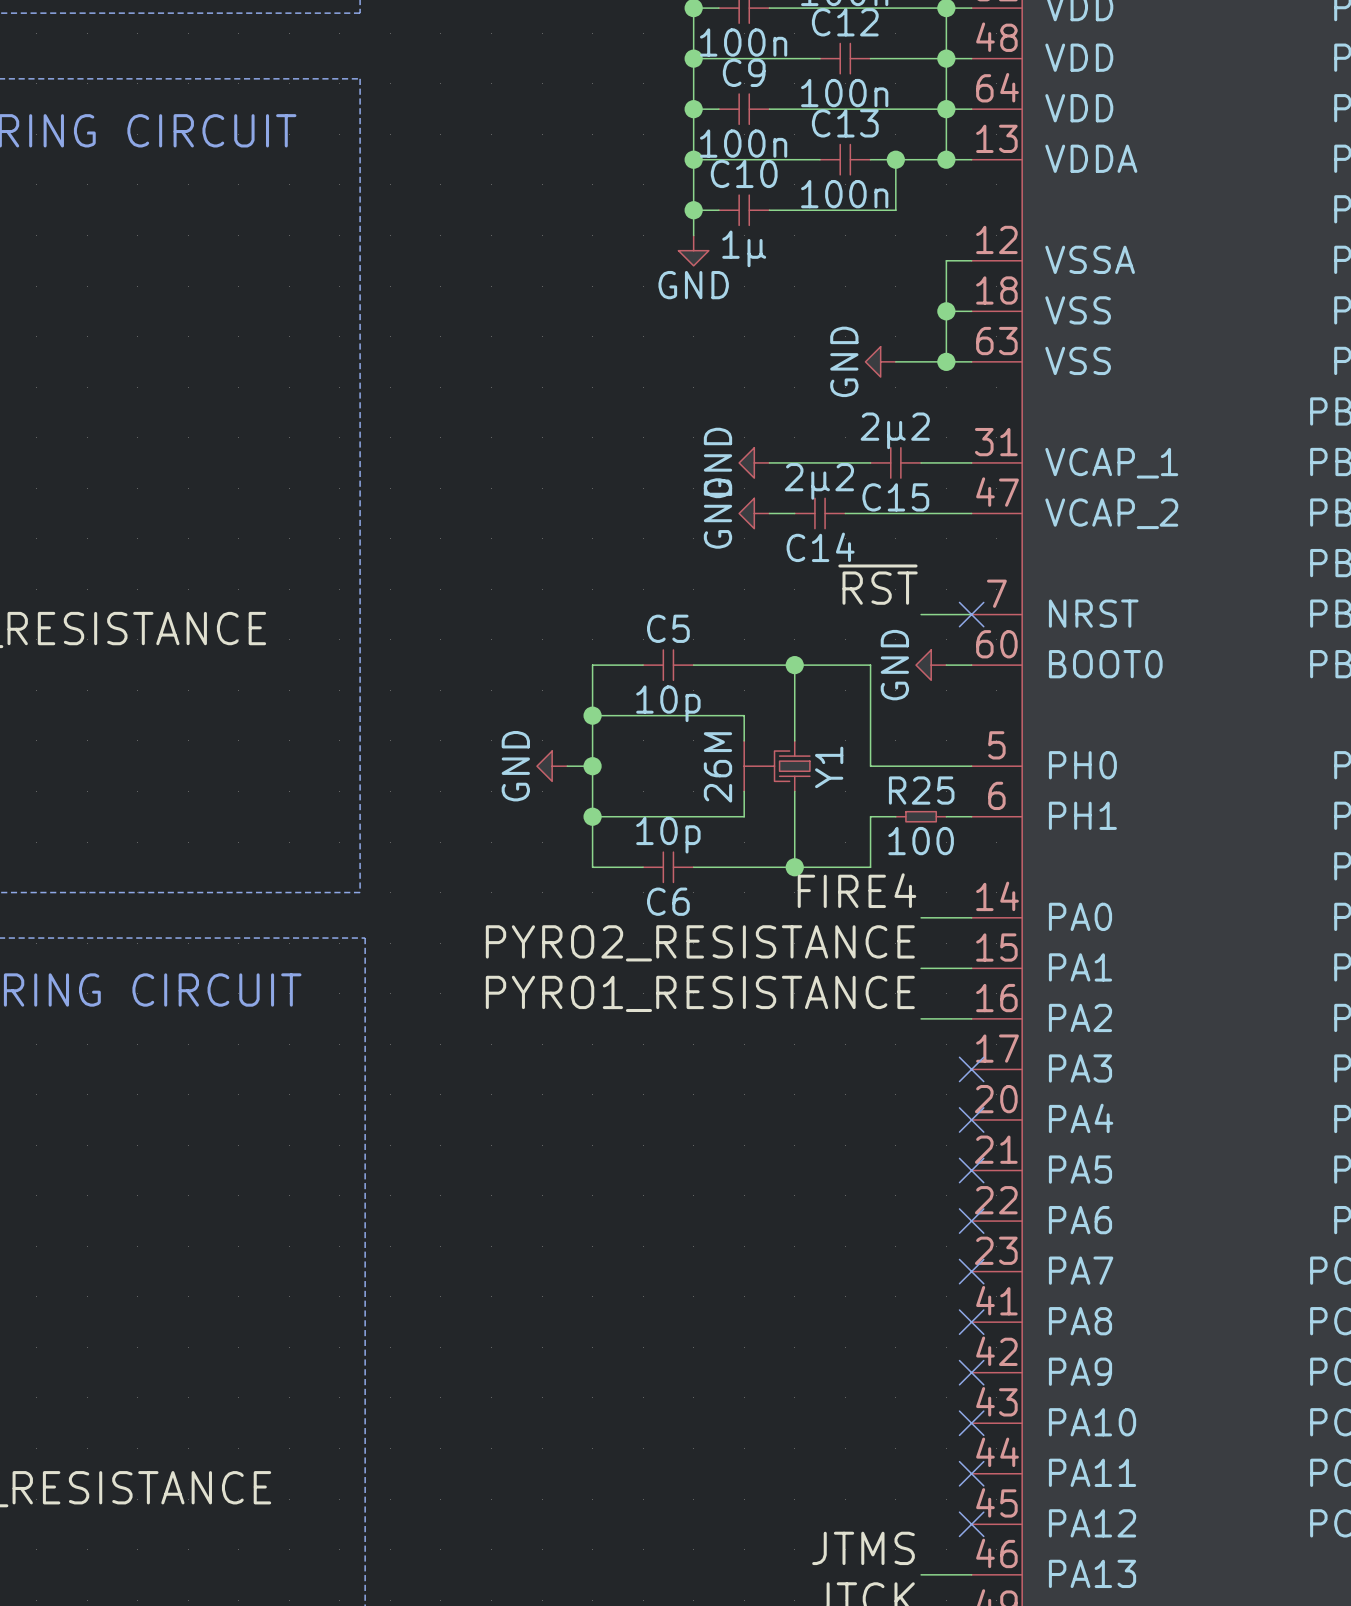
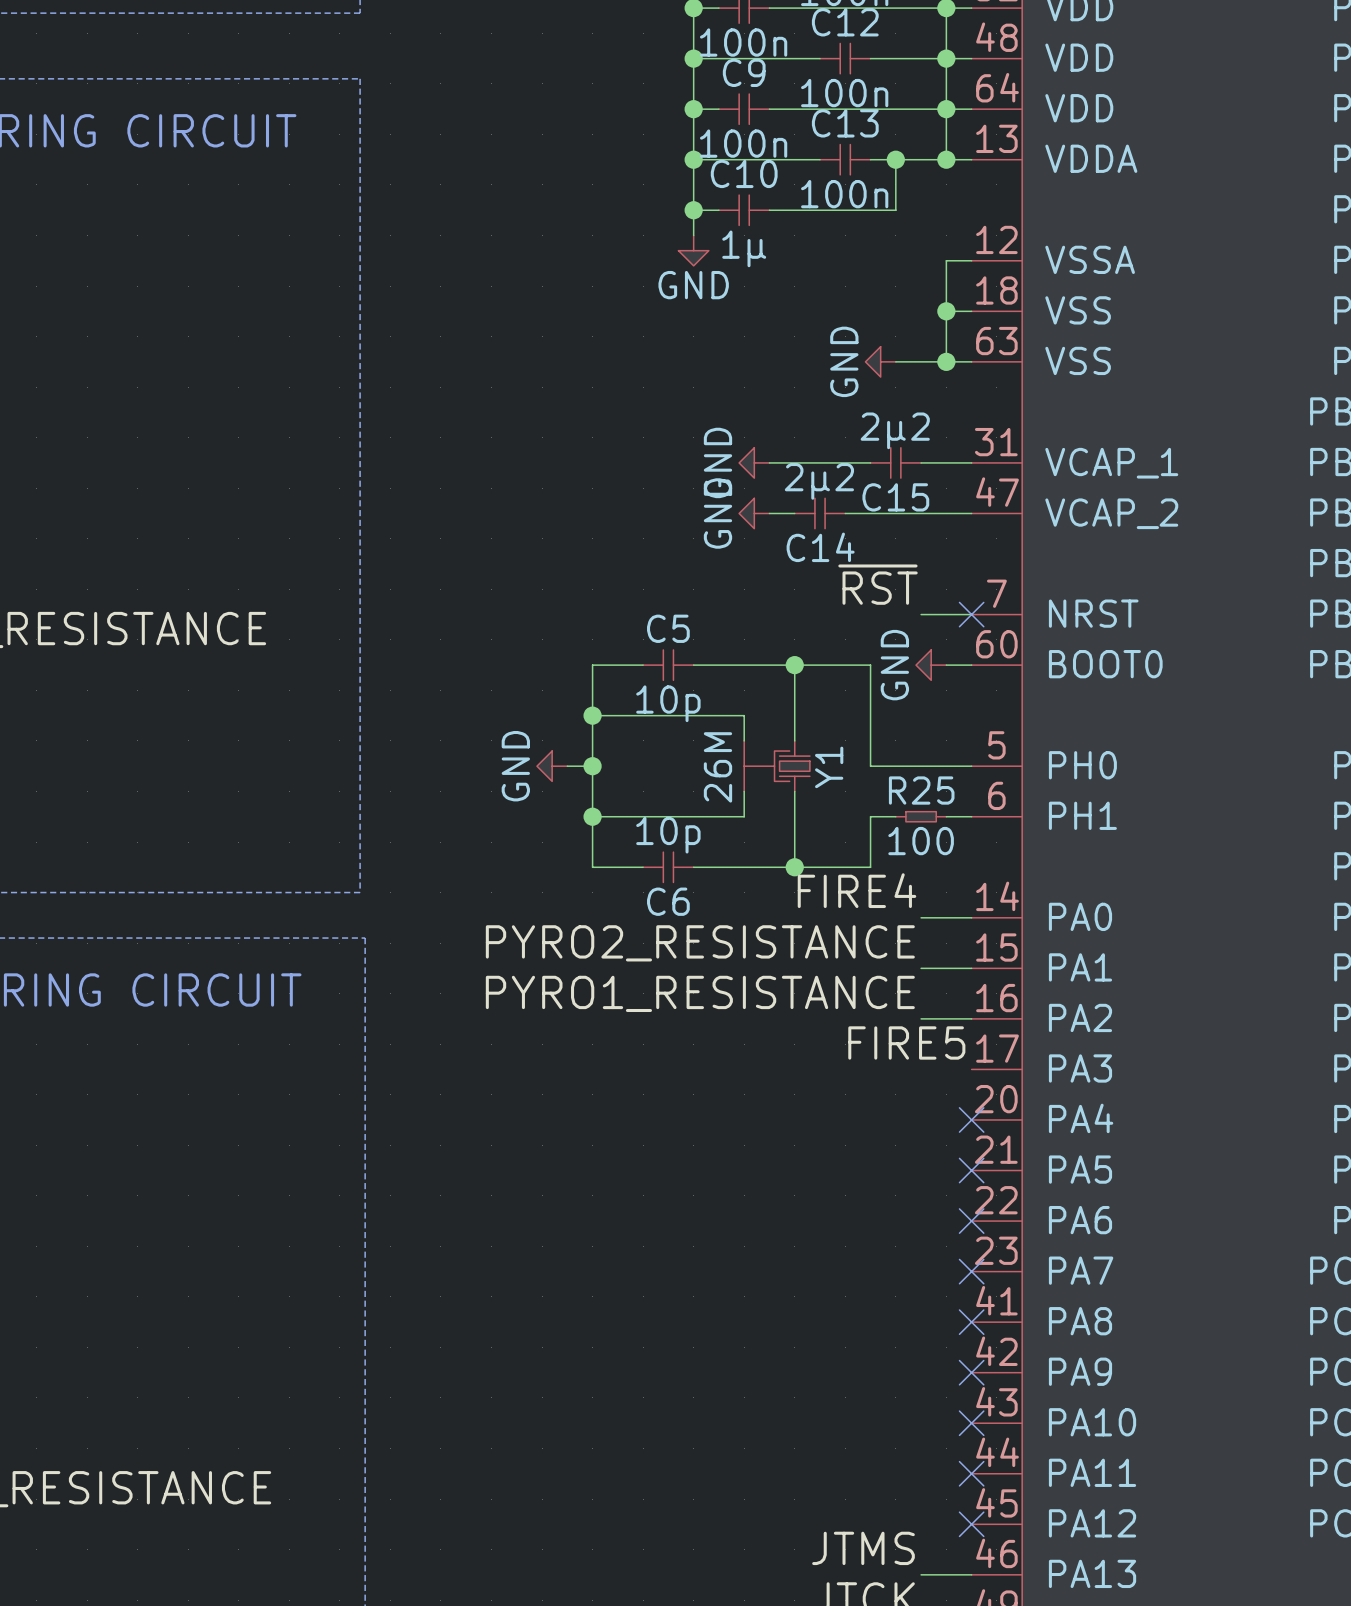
label: none -> FIRE5 (906, 1042)
no-connect mark: (971, 1069) -> none

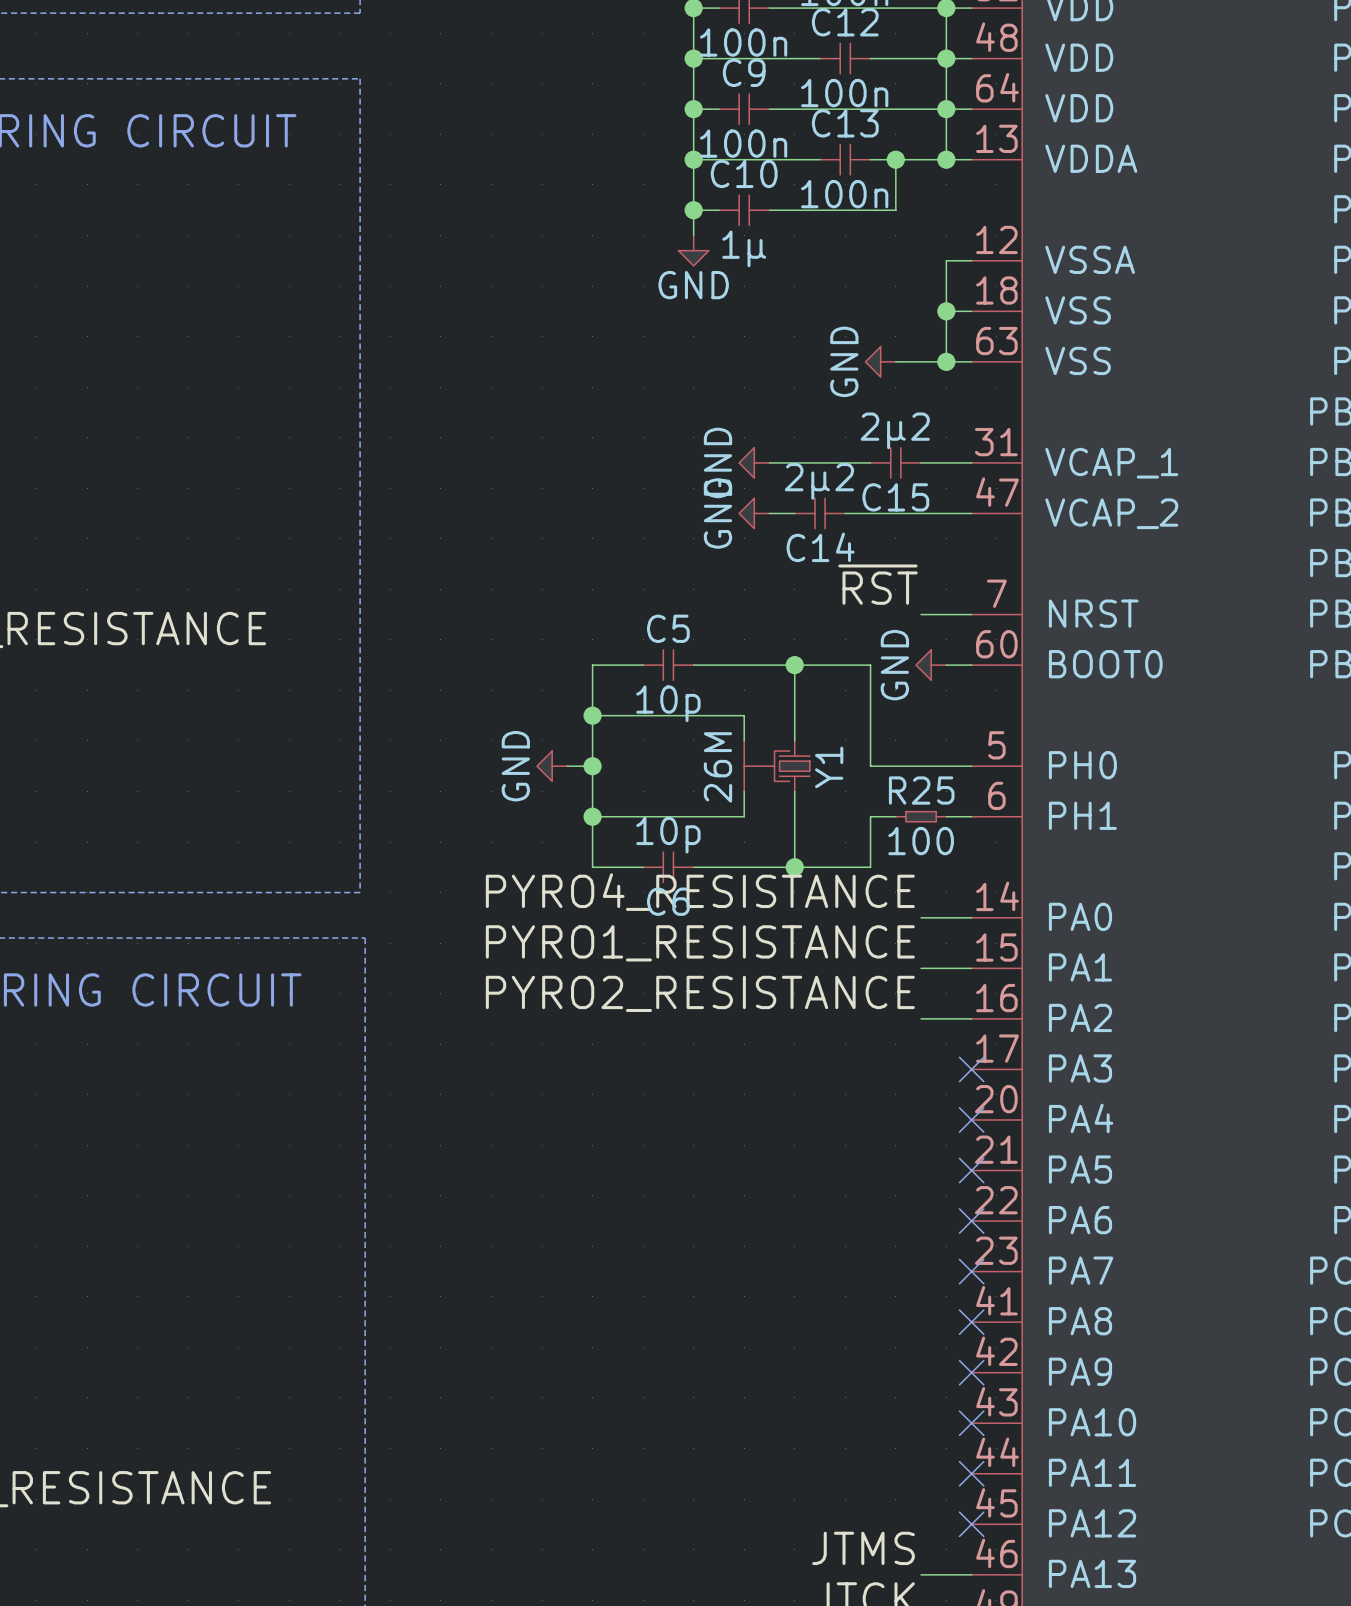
no-connect mark: (971, 614) -> none
label: FIRE4 (857, 890) -> PYRO4_RESISTANCE (700, 892)
label: PYRO2_RESISTANCE (700, 943) -> PYRO1_RESISTANCE (700, 943)
label: PYRO1_RESISTANCE (700, 993) -> PYRO2_RESISTANCE (700, 993)
label: FIRE5 (906, 1042) -> none
no-connect mark: none -> (971, 1069)

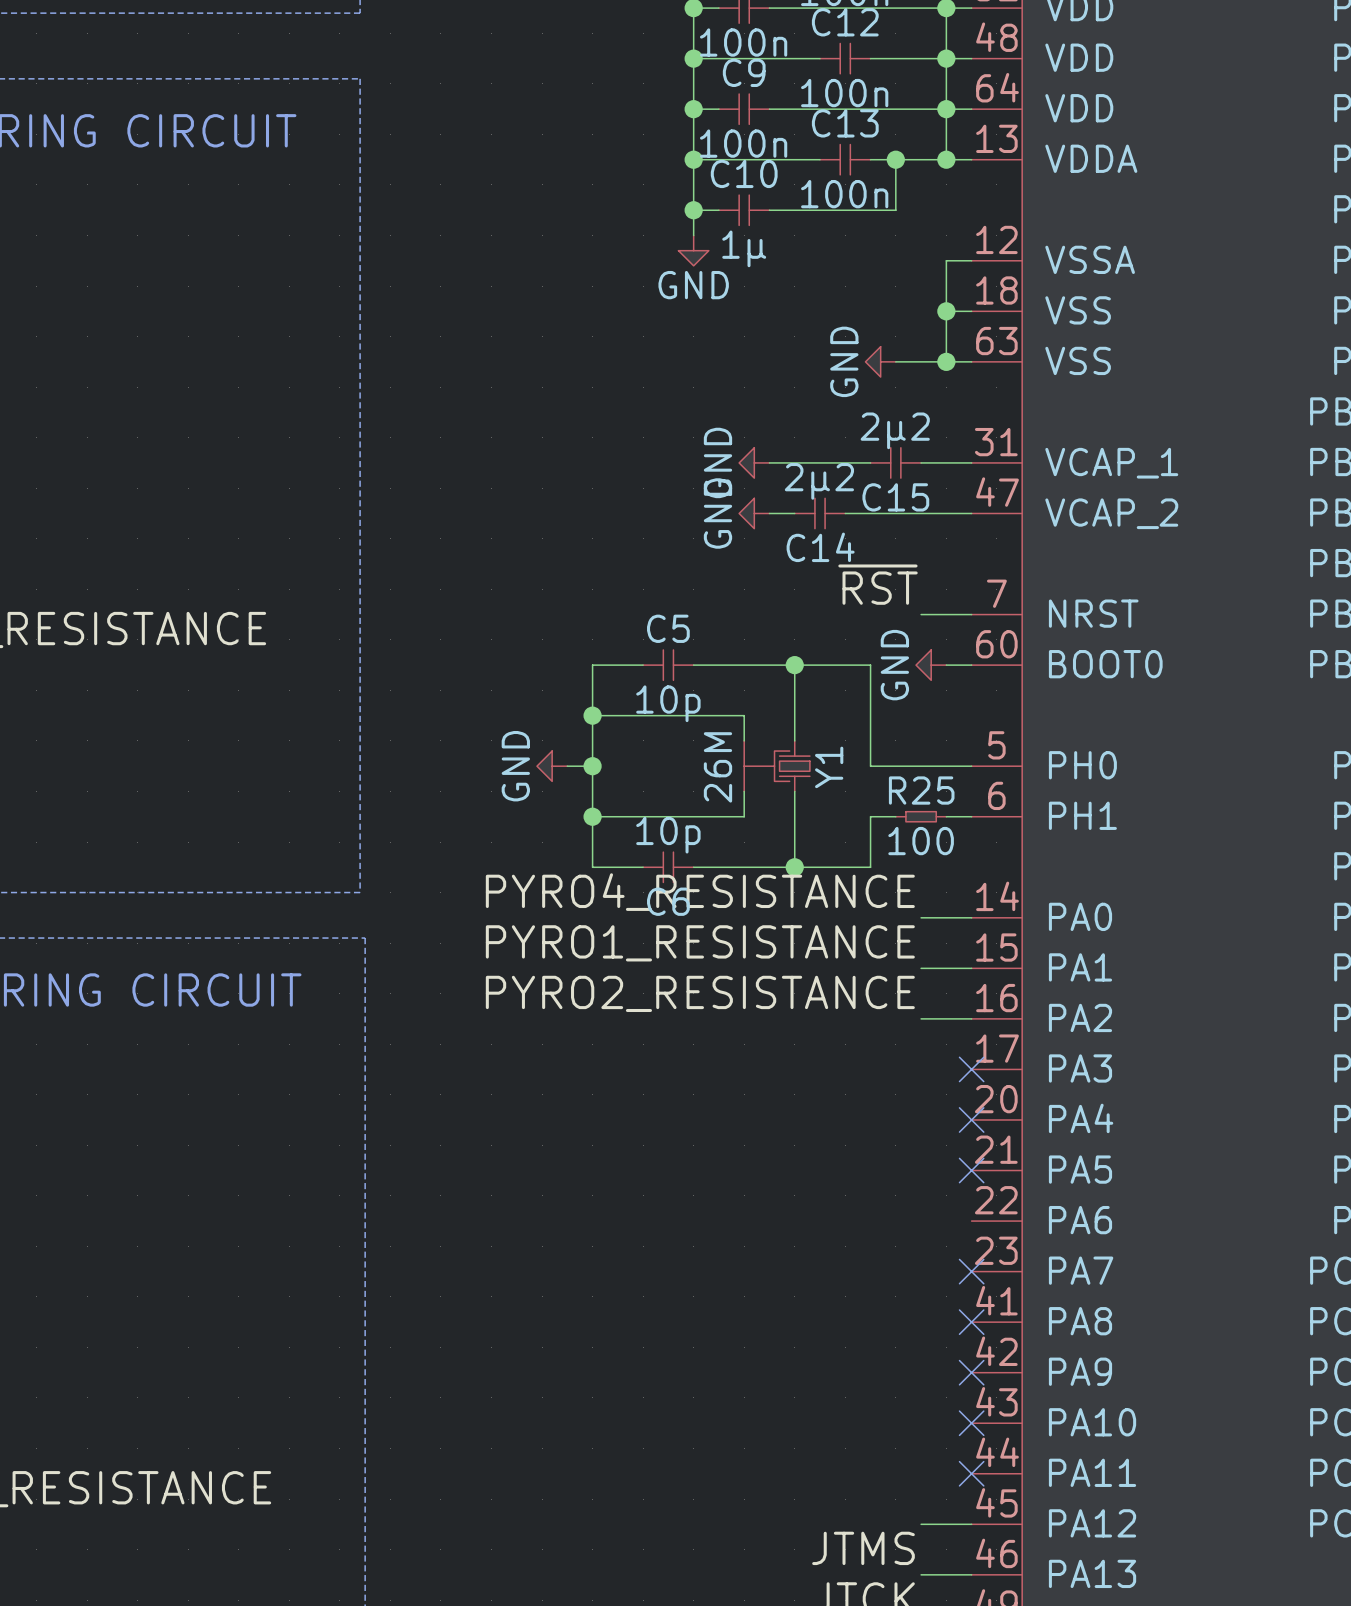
no-connect mark: (971, 1221) -> none
wire: none -> (921, 1524) (971, 1524)
no-connect mark: (971, 1524) -> none

